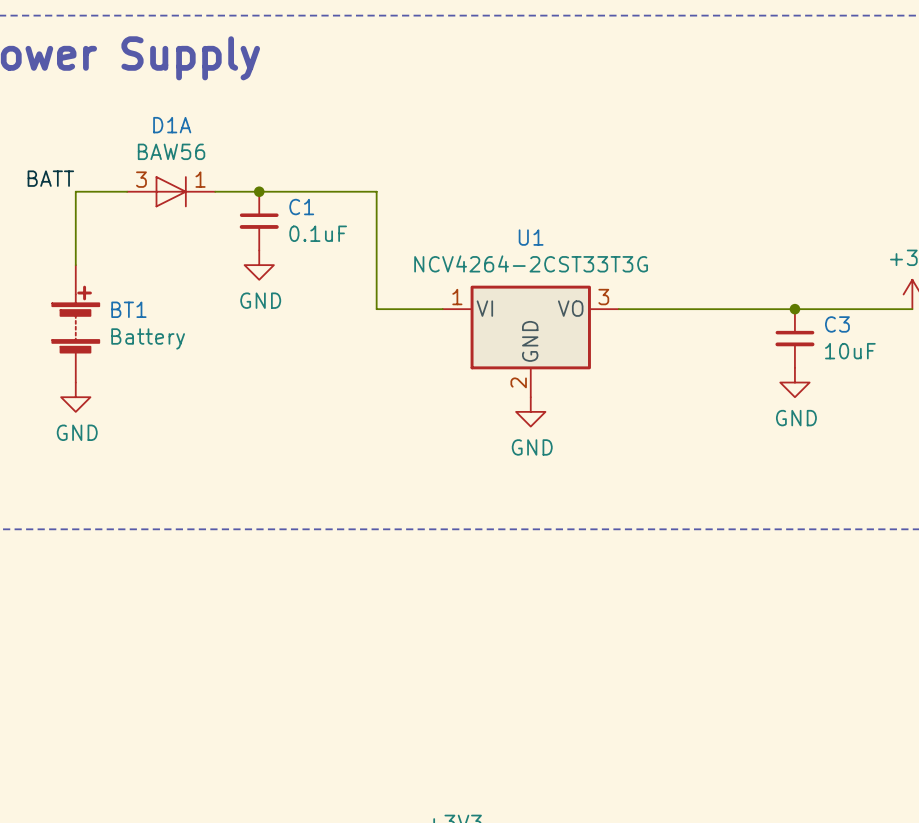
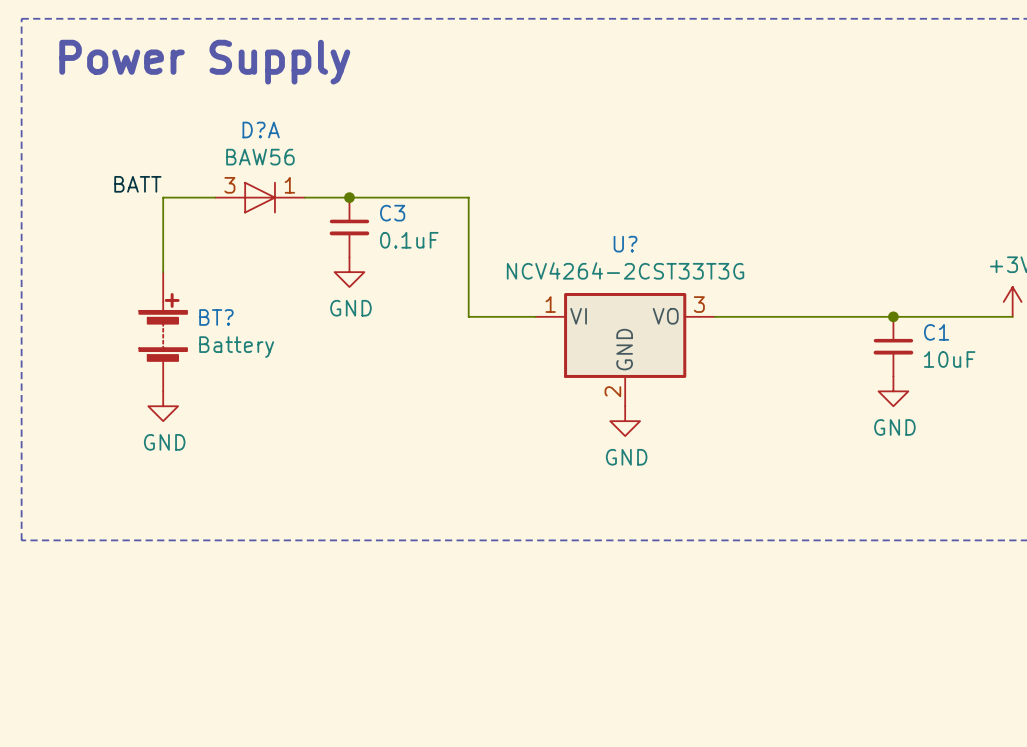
D1A name: D1A (172, 125) -> D?A (261, 130)
C1 name: C1 (301, 207) -> C3 (392, 213)
U1 name: U1 (531, 237) -> U? (625, 244)
BT1 name: BT1 (128, 309) -> BT? (216, 317)
C3 name: C3 (837, 324) -> C1 (936, 332)

